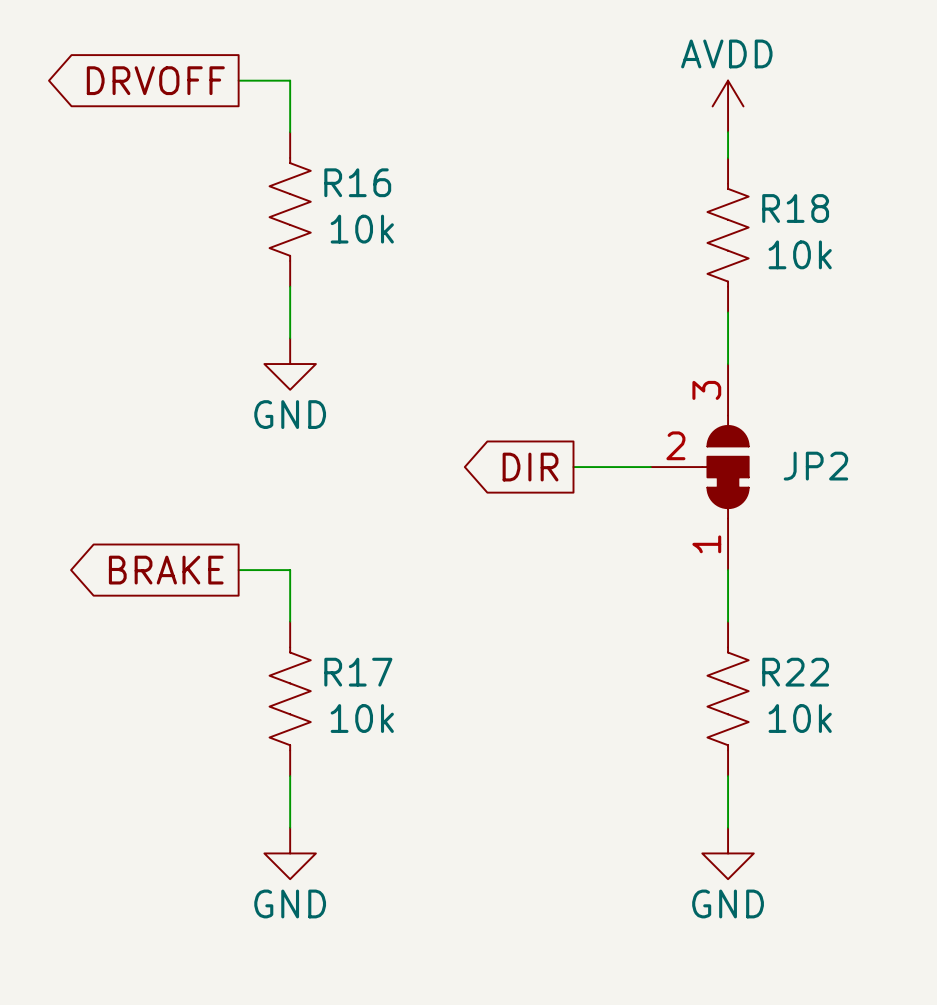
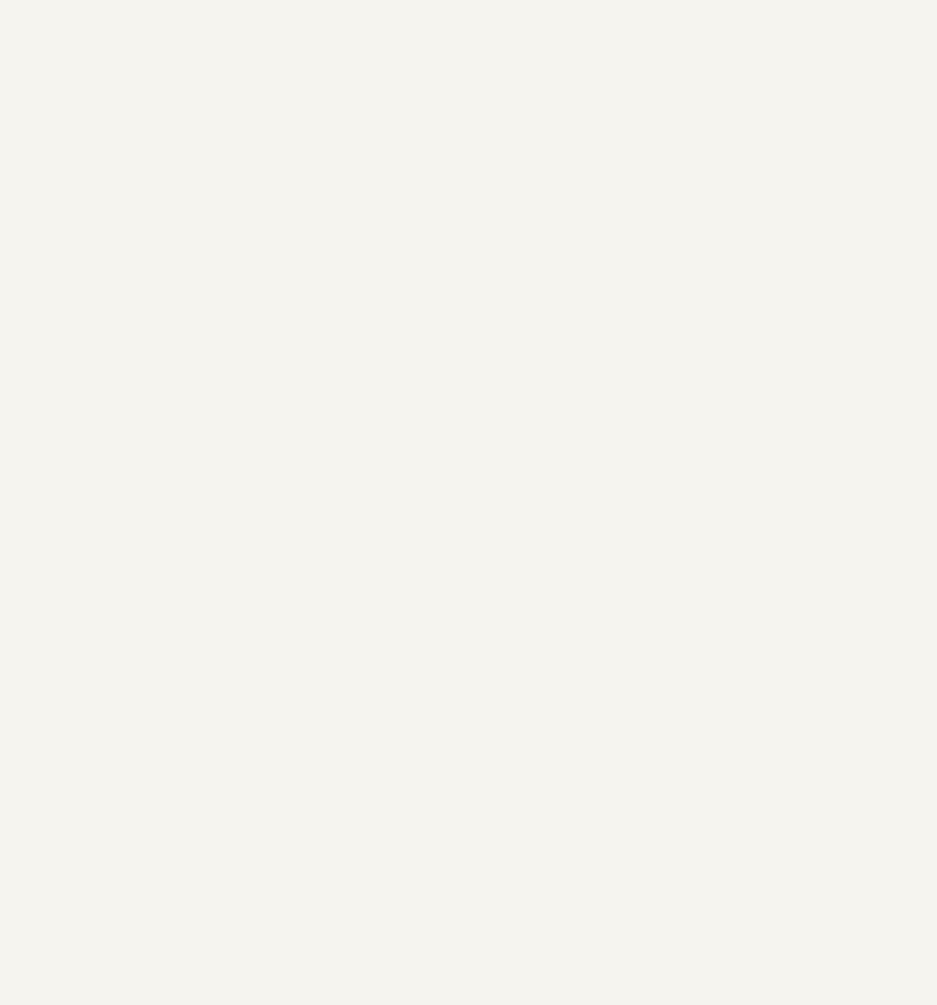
global label: DRVOFF (155, 80) -> none
wire: (238, 80) (290, 80) (290, 132) -> none
power symbol: AVDD (728, 106) -> none
wire: (728, 132) (728, 157) -> none
R16: 10k (290, 209) -> none
R18: 10k (728, 235) -> none
wire: (290, 286) (290, 338) -> none
wire: (728, 312) (728, 364) -> none
power symbol: GND (290, 364) -> none
global label: DIR (530, 467) -> none
wire: (573, 467) (650, 467) -> none
JP2: (699, 467) -> none
global label: BRAKE (166, 570) -> none
wire: (238, 570) (290, 570) (290, 621) -> none
wire: (728, 570) (728, 621) -> none
R17: 10k (290, 698) -> none
R22: 10k (728, 698) -> none
wire: (290, 776) (290, 827) -> none
wire: (728, 776) (728, 827) -> none
power symbol: GND (290, 853) -> none
power symbol: GND (728, 853) -> none

